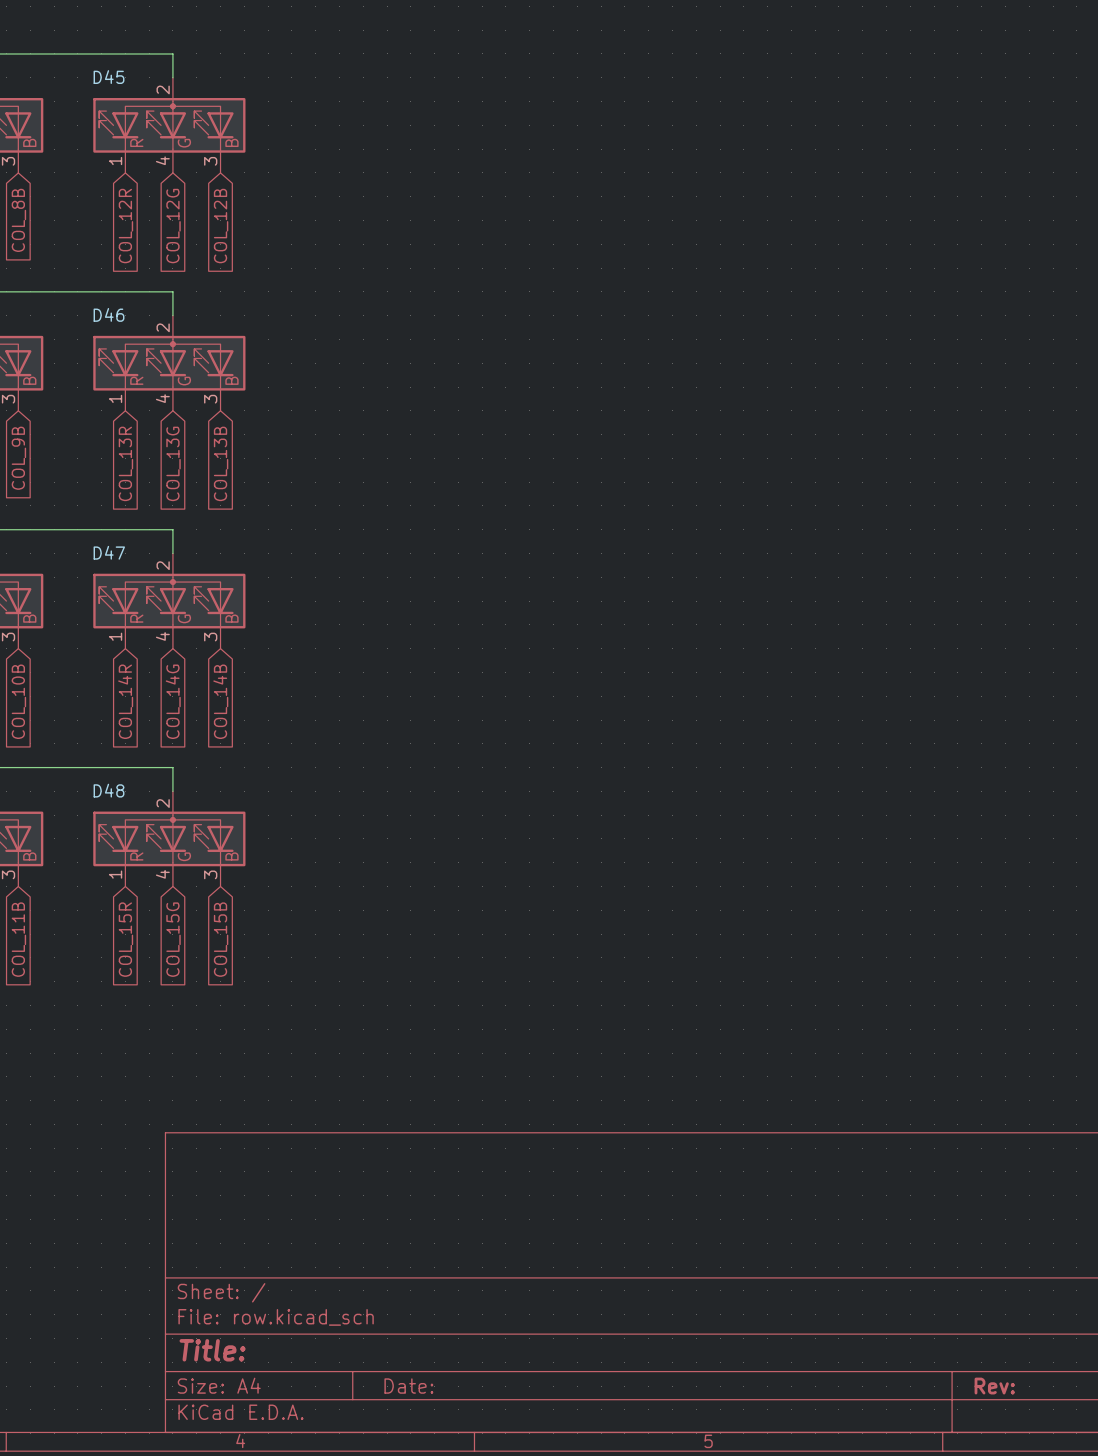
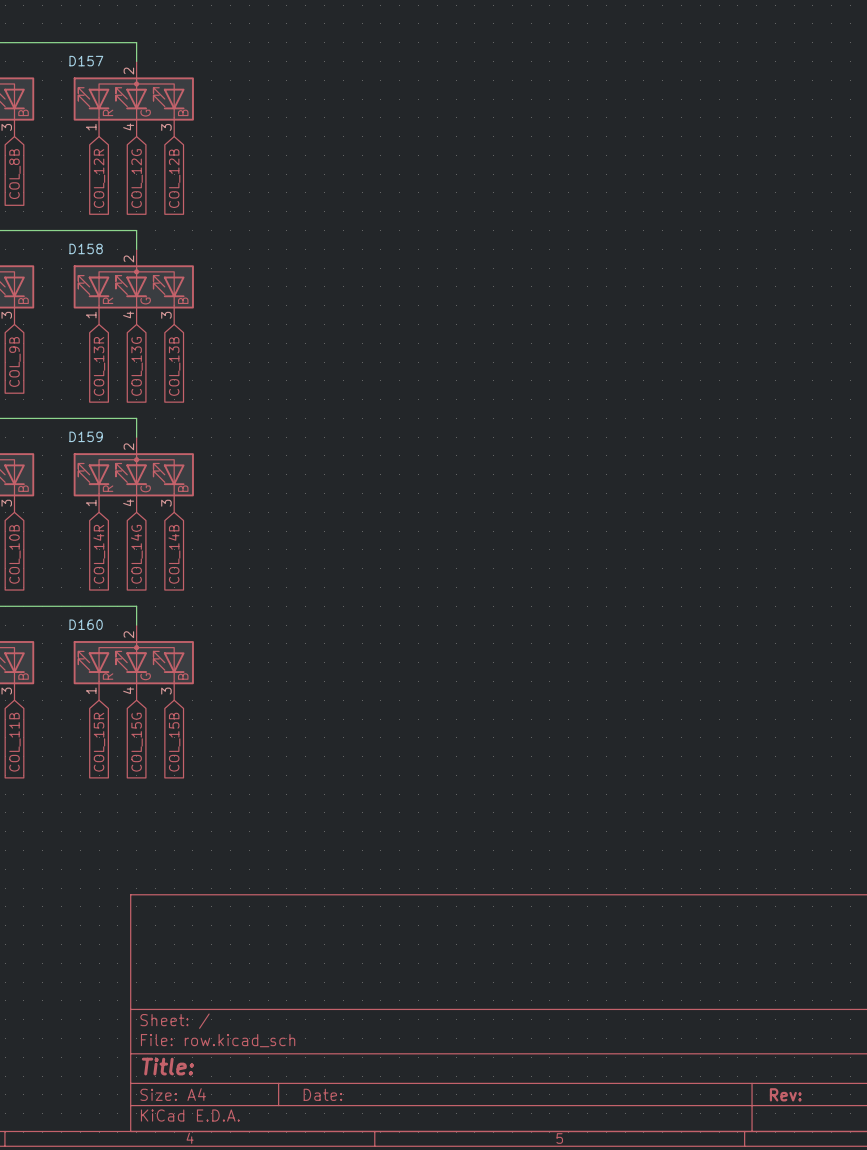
D45 name: D45 (109, 77) -> D157 (86, 61)
D46 name: D46 (109, 314) -> D158 (86, 248)
D47 name: D47 (109, 552) -> D159 (86, 436)
D48 name: D48 (109, 790) -> D160 (86, 624)

